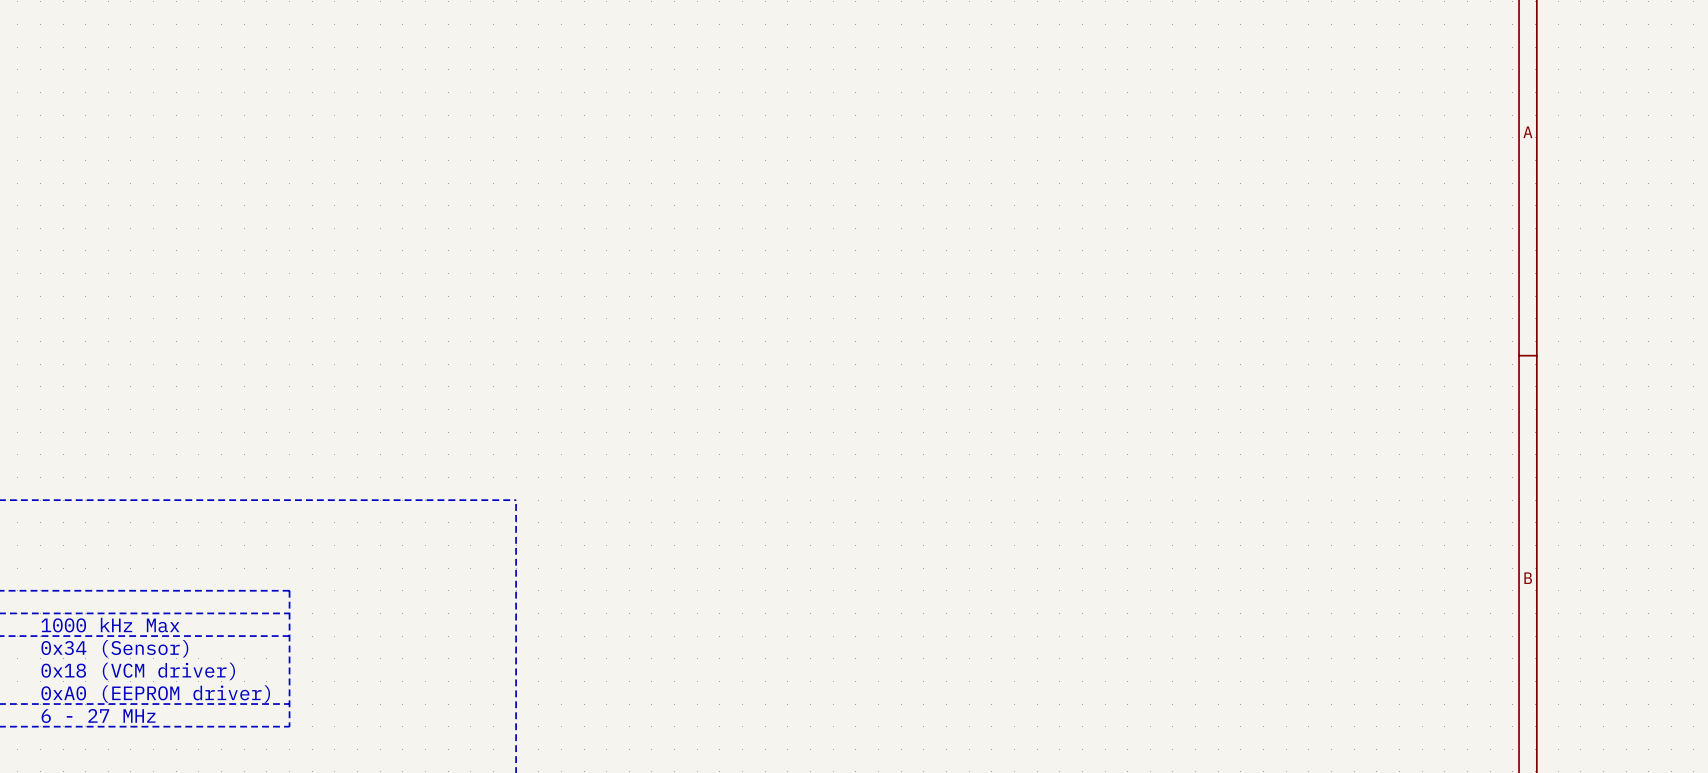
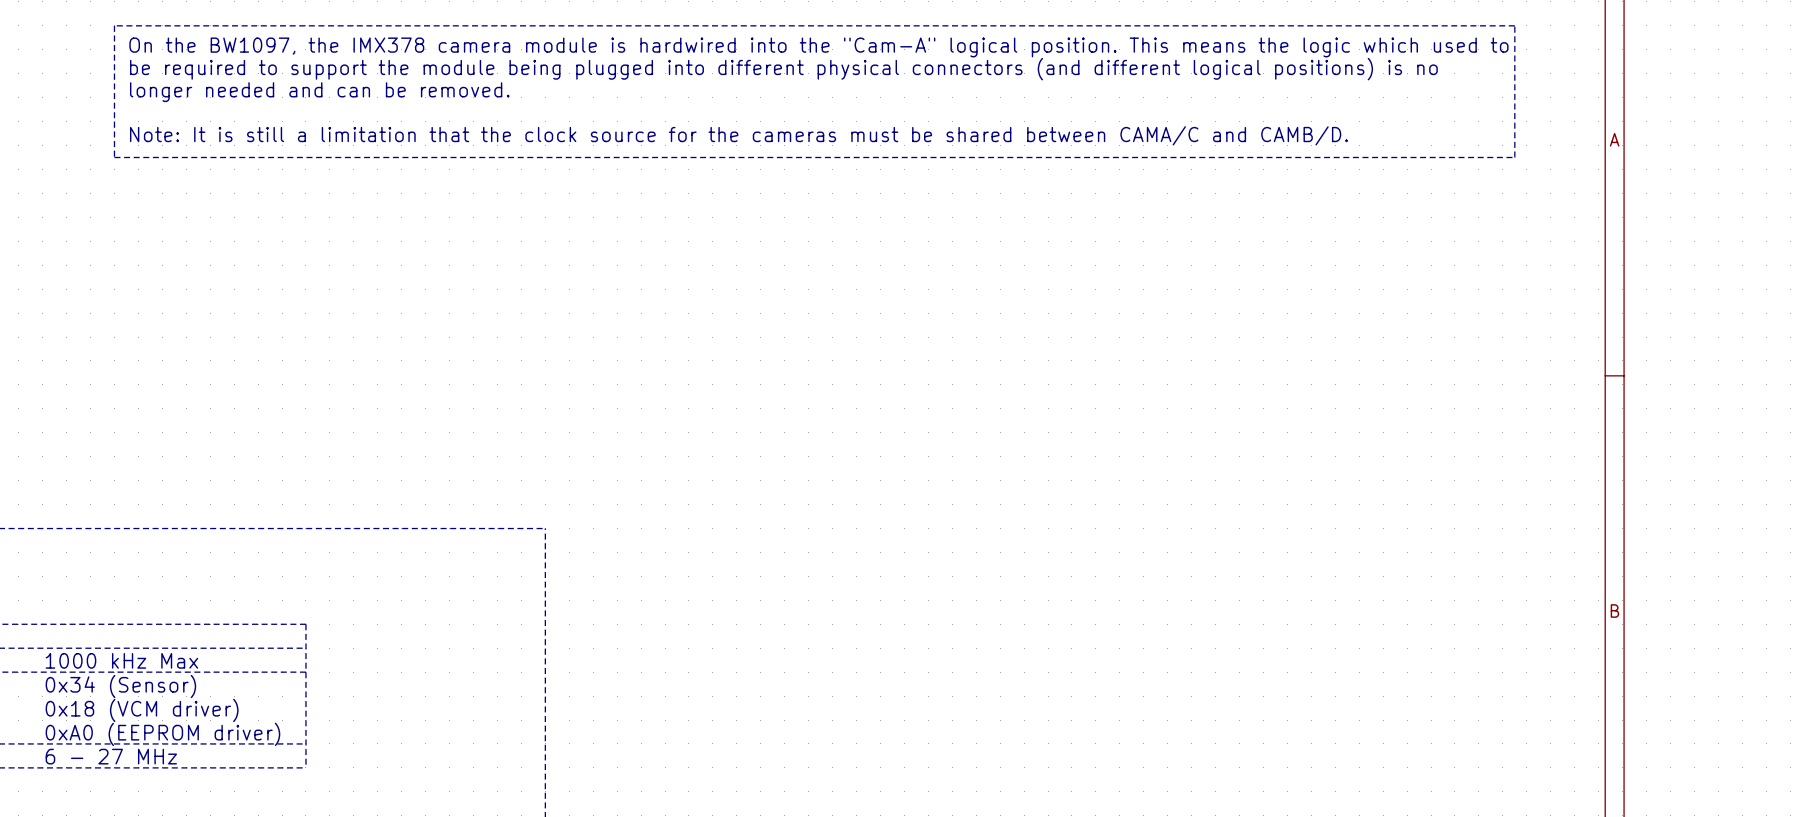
line: none -> (114, 25) (1514, 25) (1514, 157) (114, 157) (114, 25)
text: none -> On the BW1097, the IMX378 camera module is hardwired into the "Cam-A" logical position. This means the logic which used to (818, 47)
text: none -> be required to support the module being plugged into different physical connectors (and different logical positions) is no (783, 69)
text: none -> longer needed and can be removed. (319, 92)
text: none -> Note: It is still a limitation that the clock source for the cameras must be shared between CAMA/C and CAMB/D. (738, 135)

